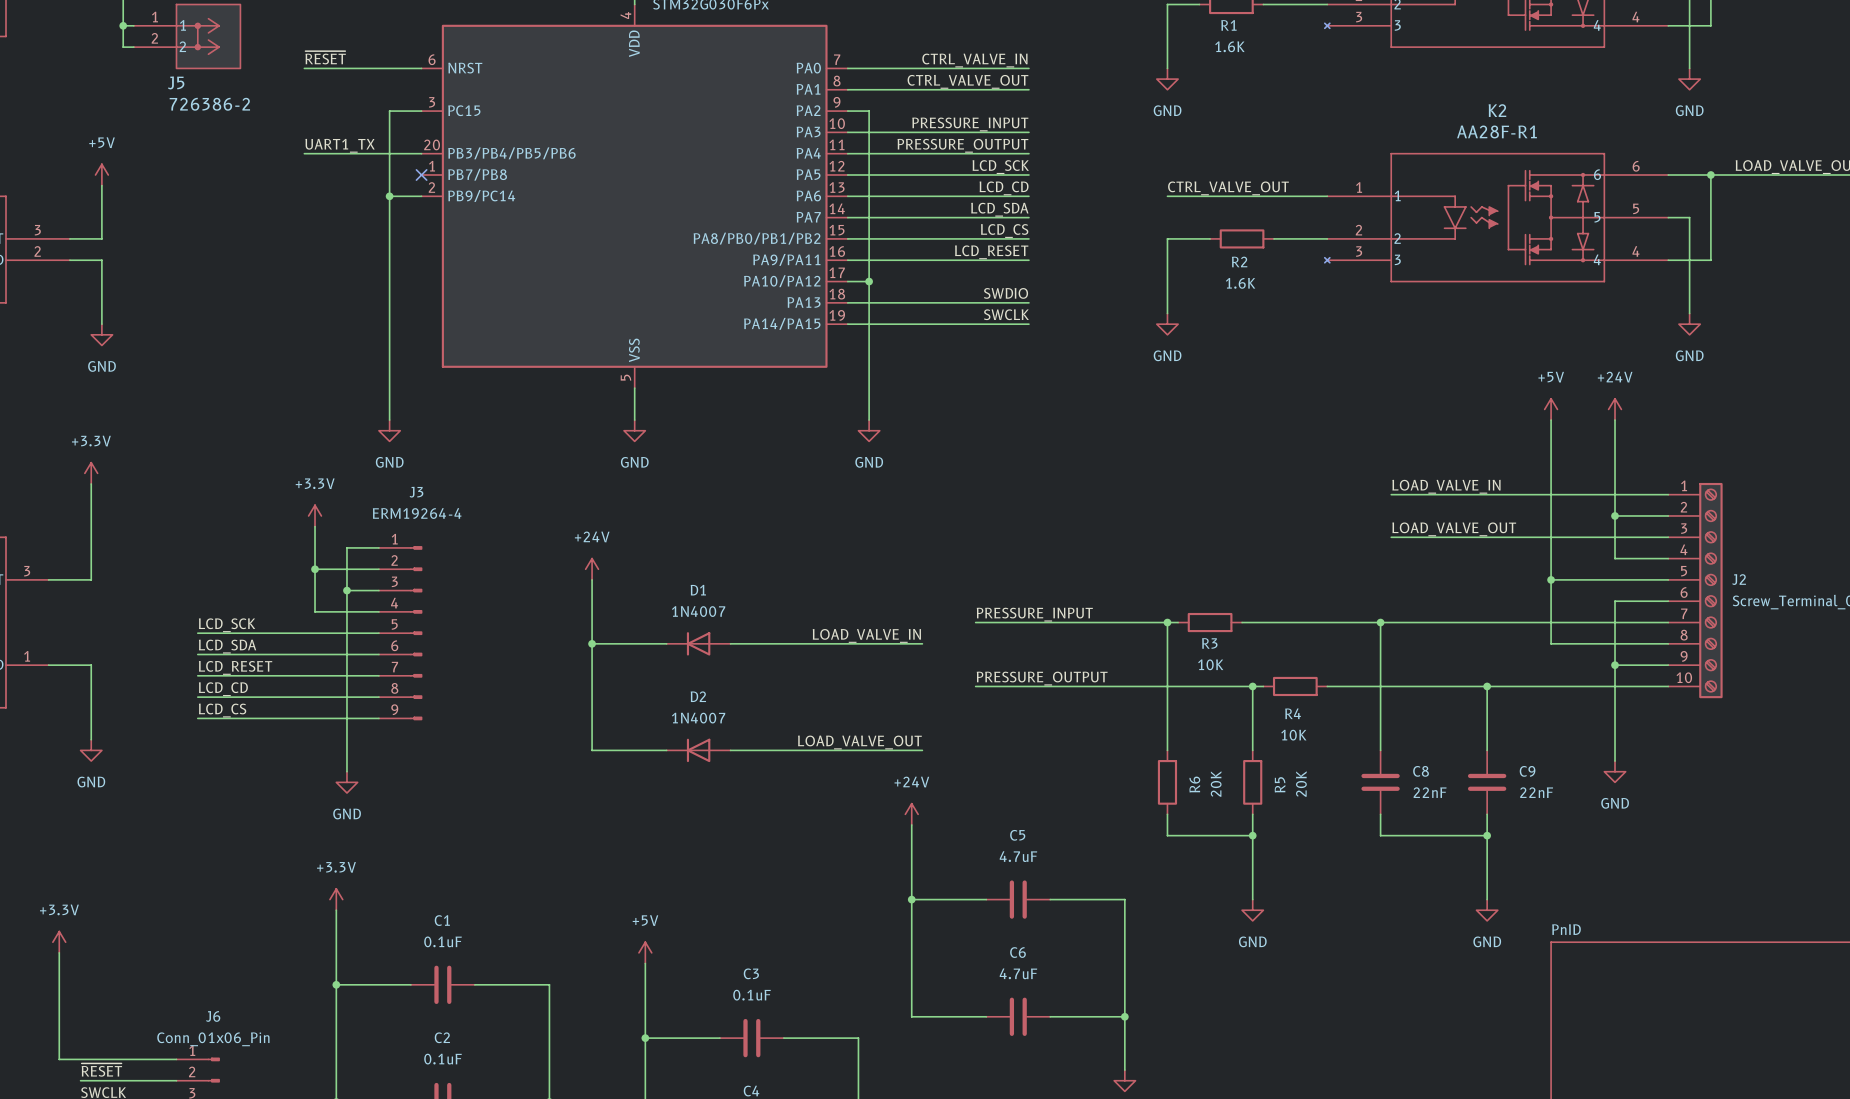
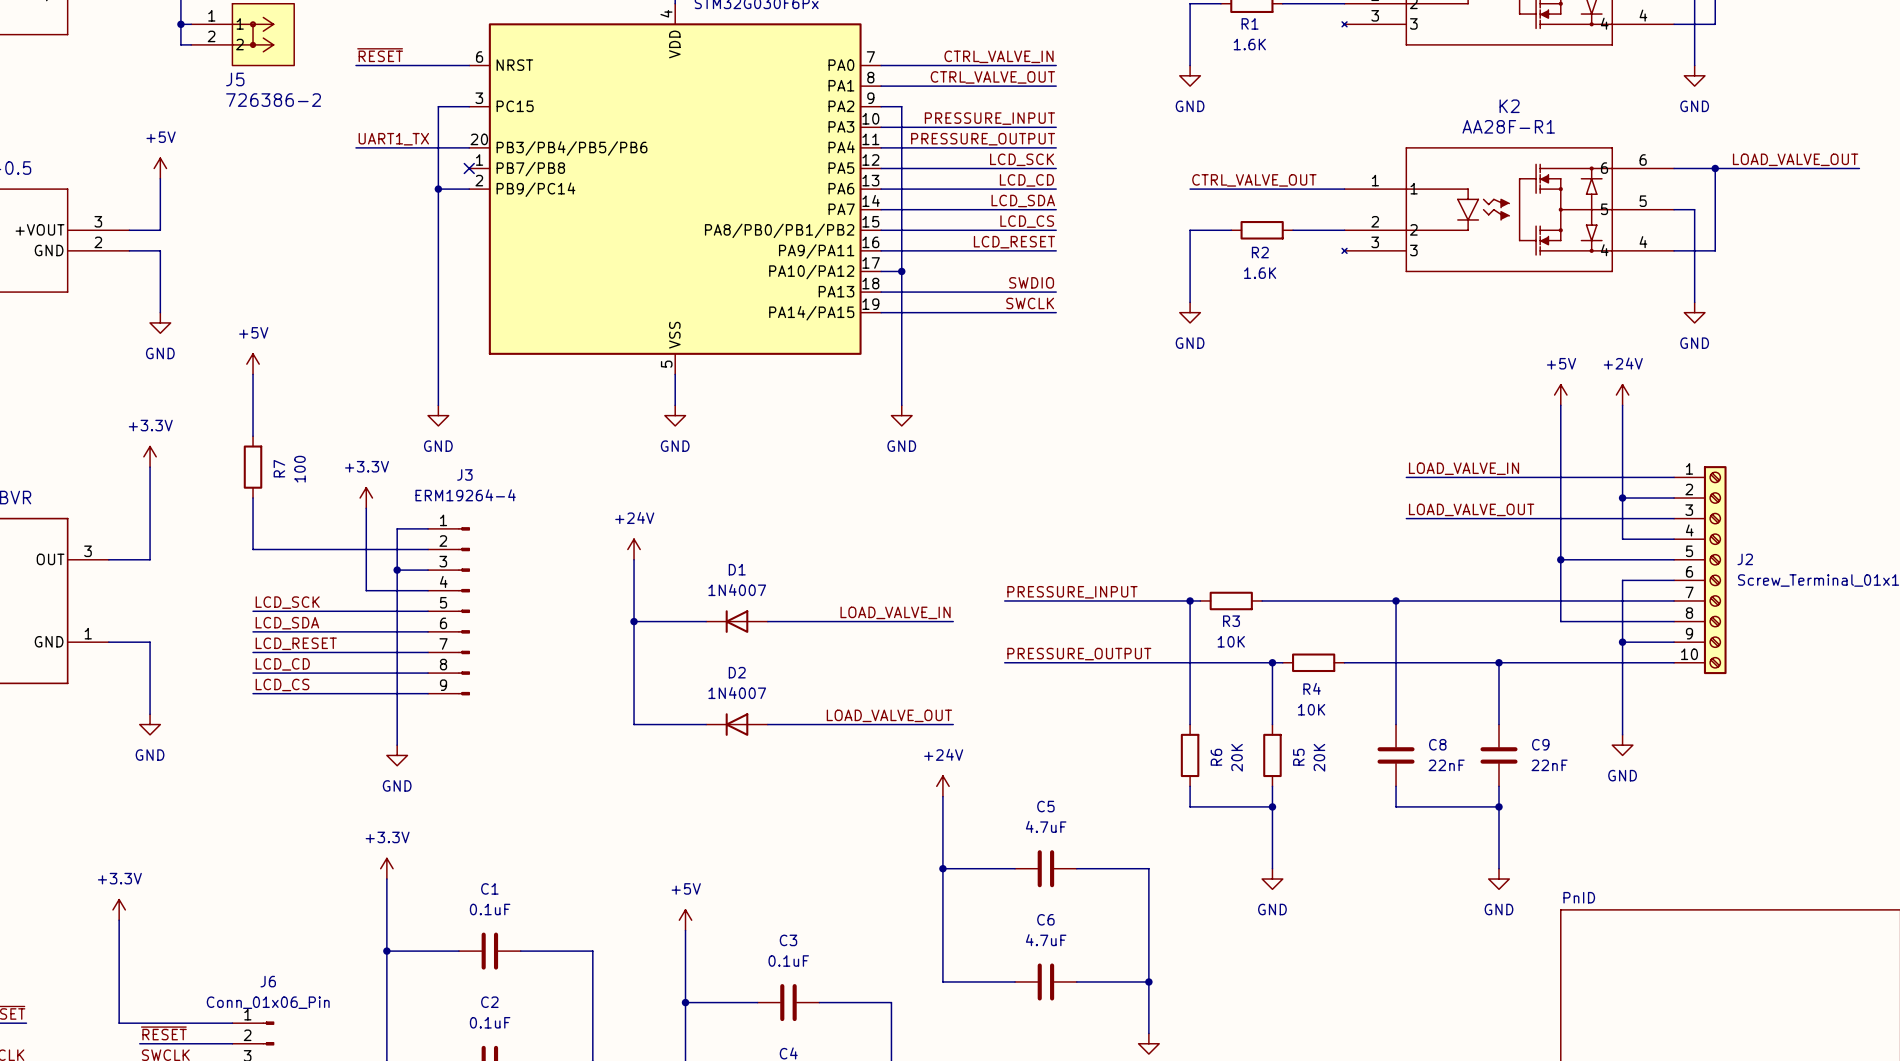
power symbol: none -> +5V (253, 364)
wire: none -> (253, 374) (253, 436)
R7: none -> 100 (253, 467)
wire: none -> (253, 498) (253, 549) (366, 549)
junction: (315, 569) -> none

